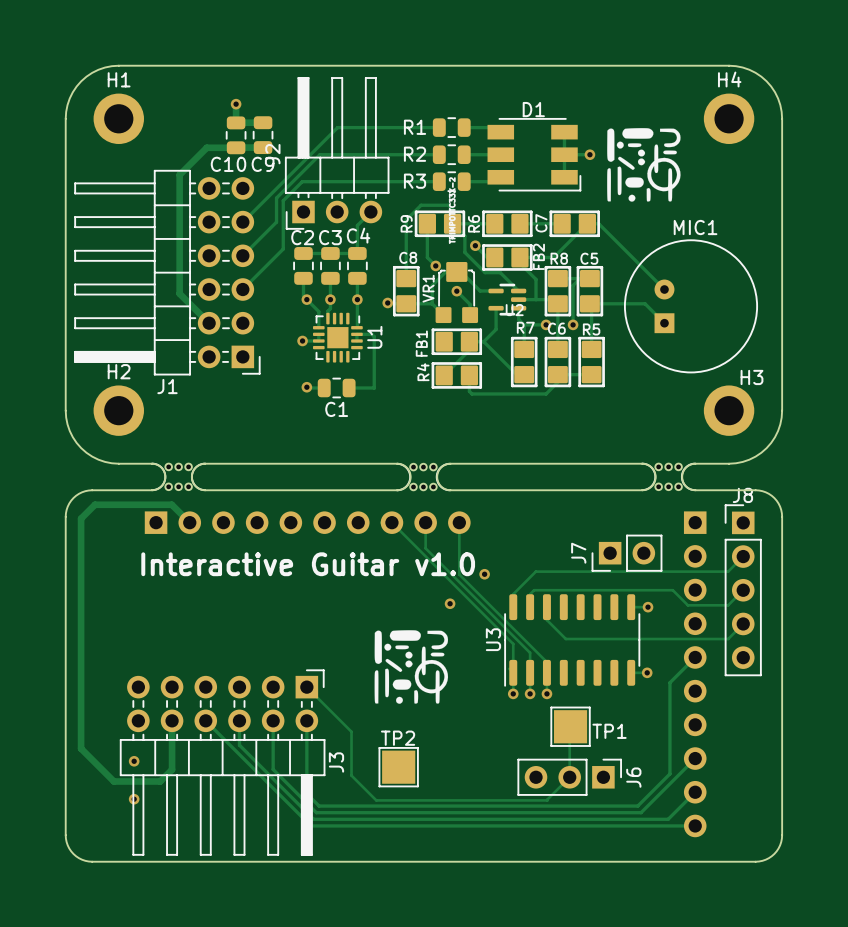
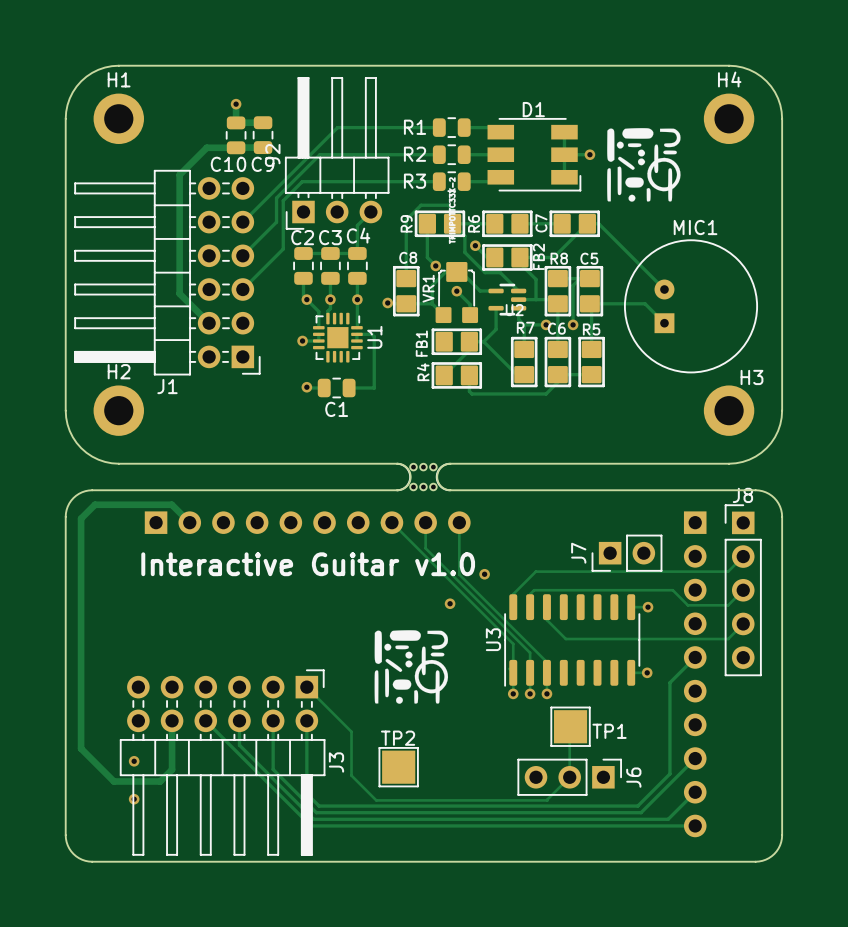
board edge: (152, 463) (161, 467) (165, 476) (161, 486) (152, 490) -> (152, 463) (205, 463)
board edge: (205, 463) (195, 467) (191, 476) (195, 486) (205, 490) -> (152, 490) (205, 490)
board edge: (642, 463) (651, 467) (655, 476) (651, 486) (642, 490) -> (642, 463) (695, 463)
board edge: (695, 463) (686, 467) (682, 476) (686, 486) (695, 490) -> (642, 490) (695, 490)
part: (178, 476) -> none
part: (668, 476) -> none

